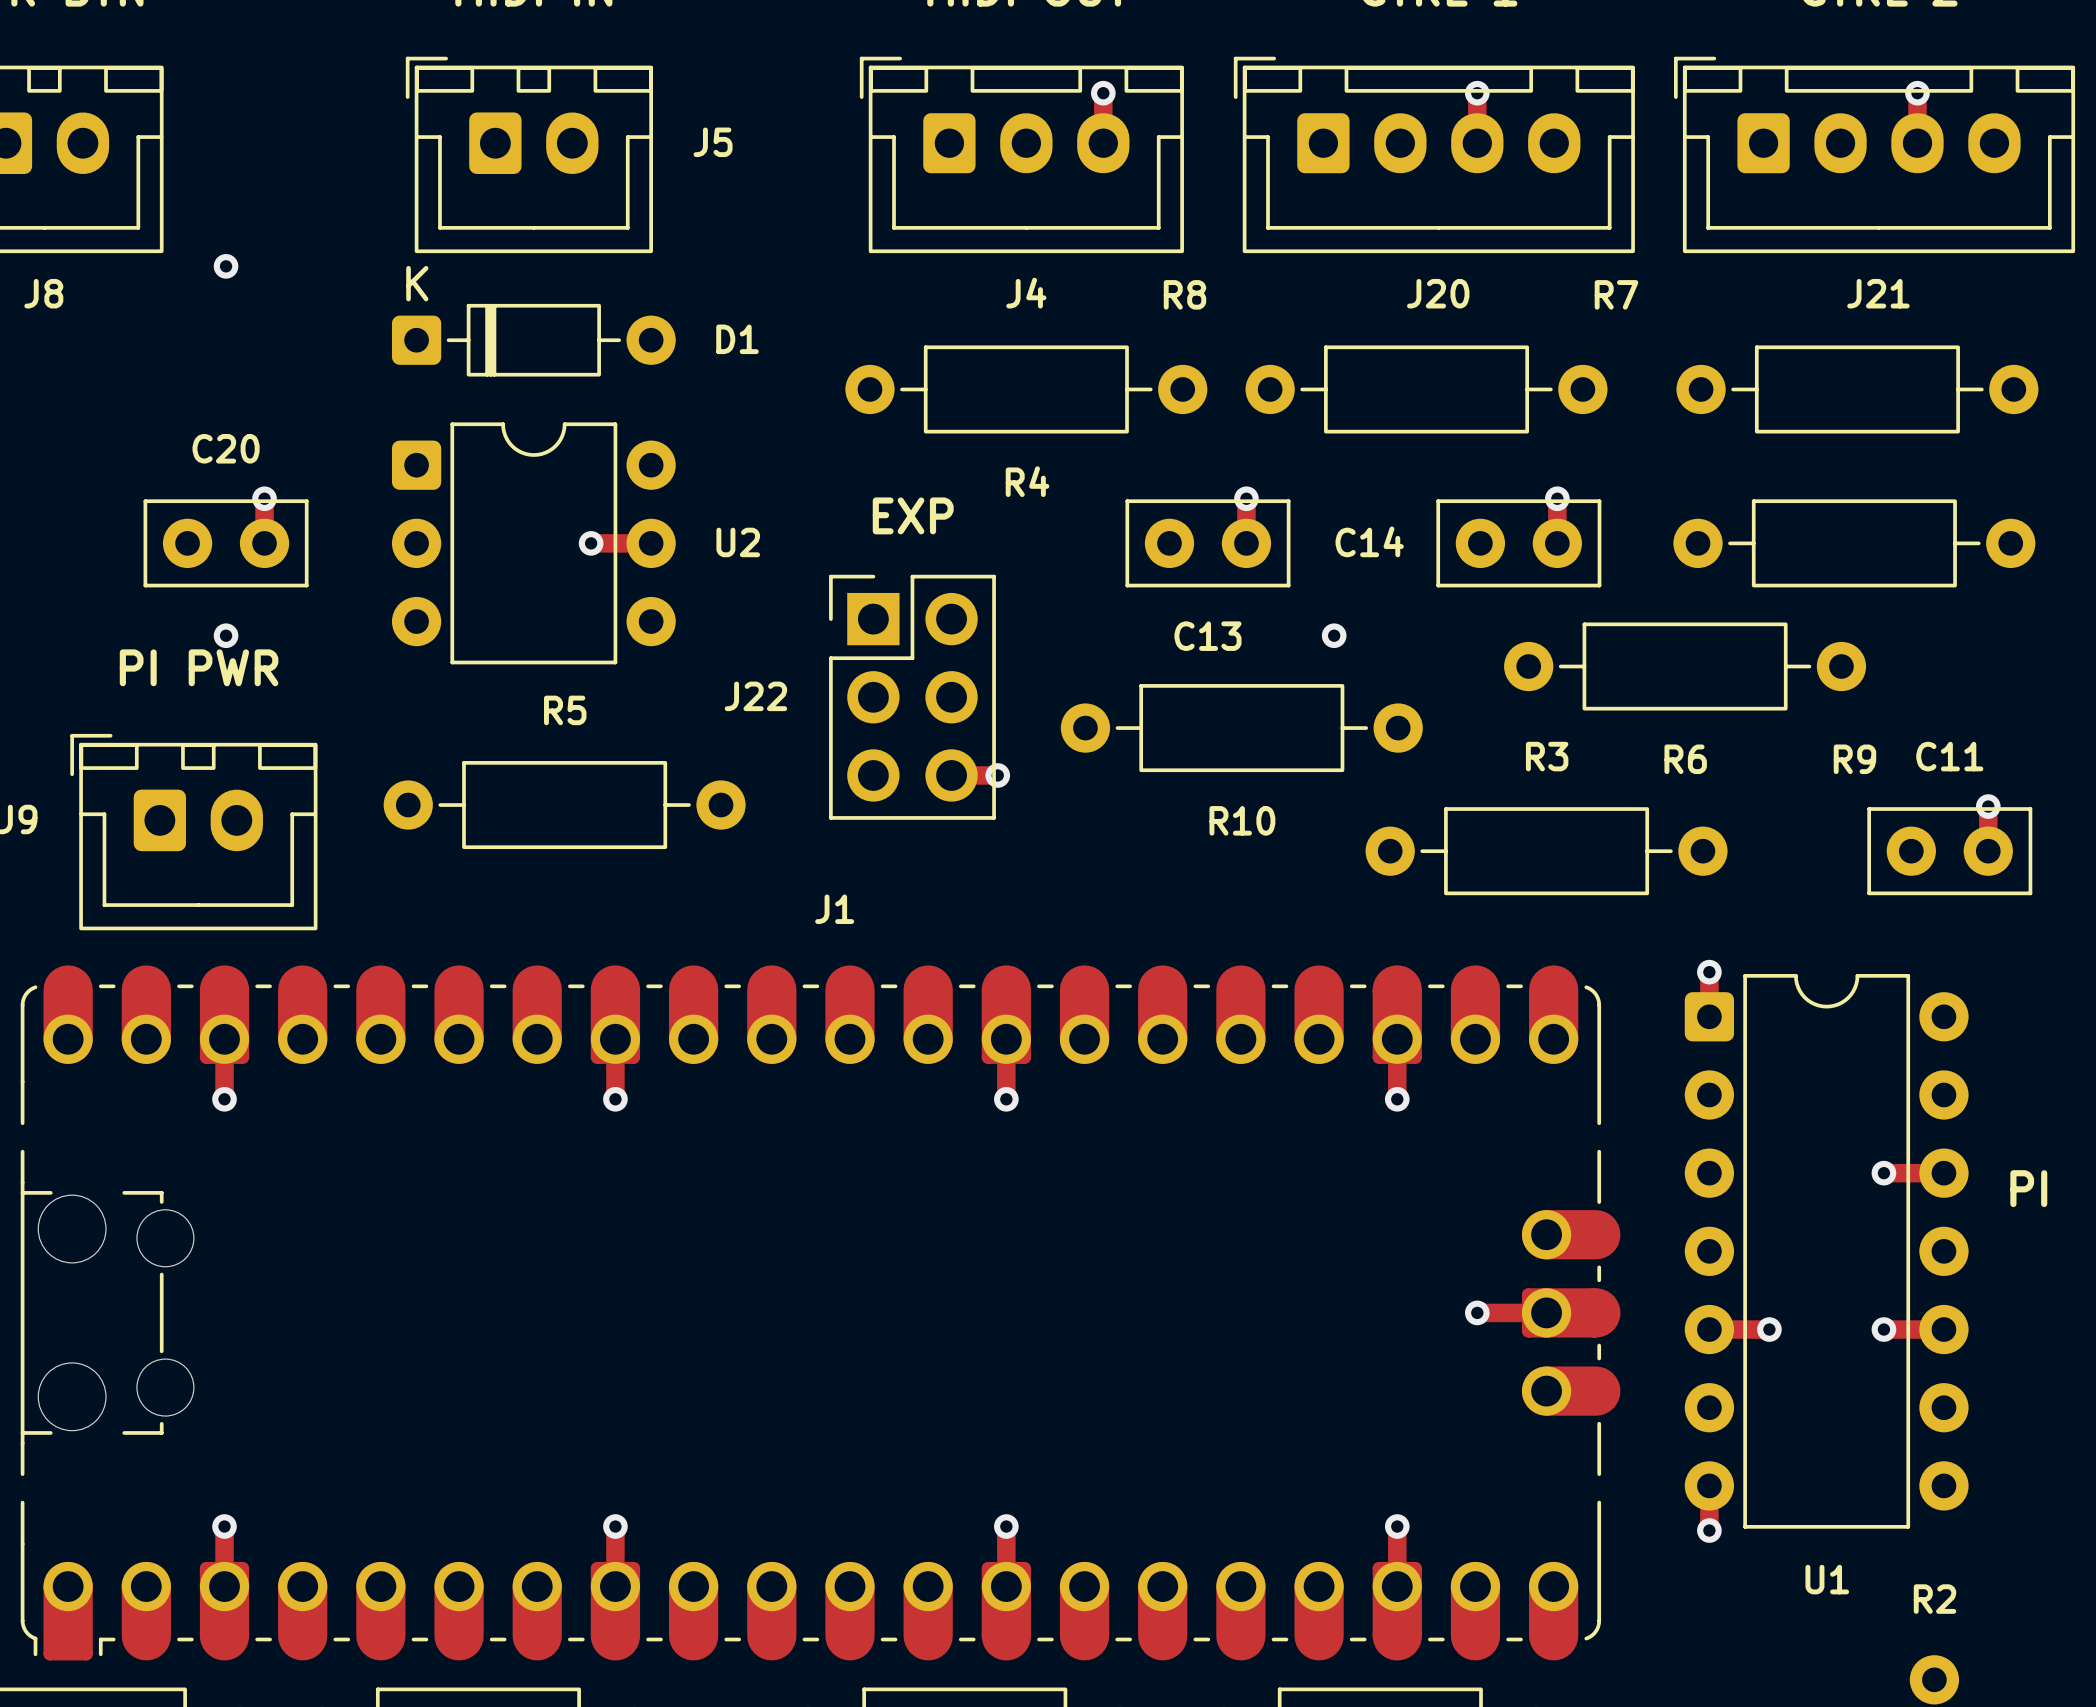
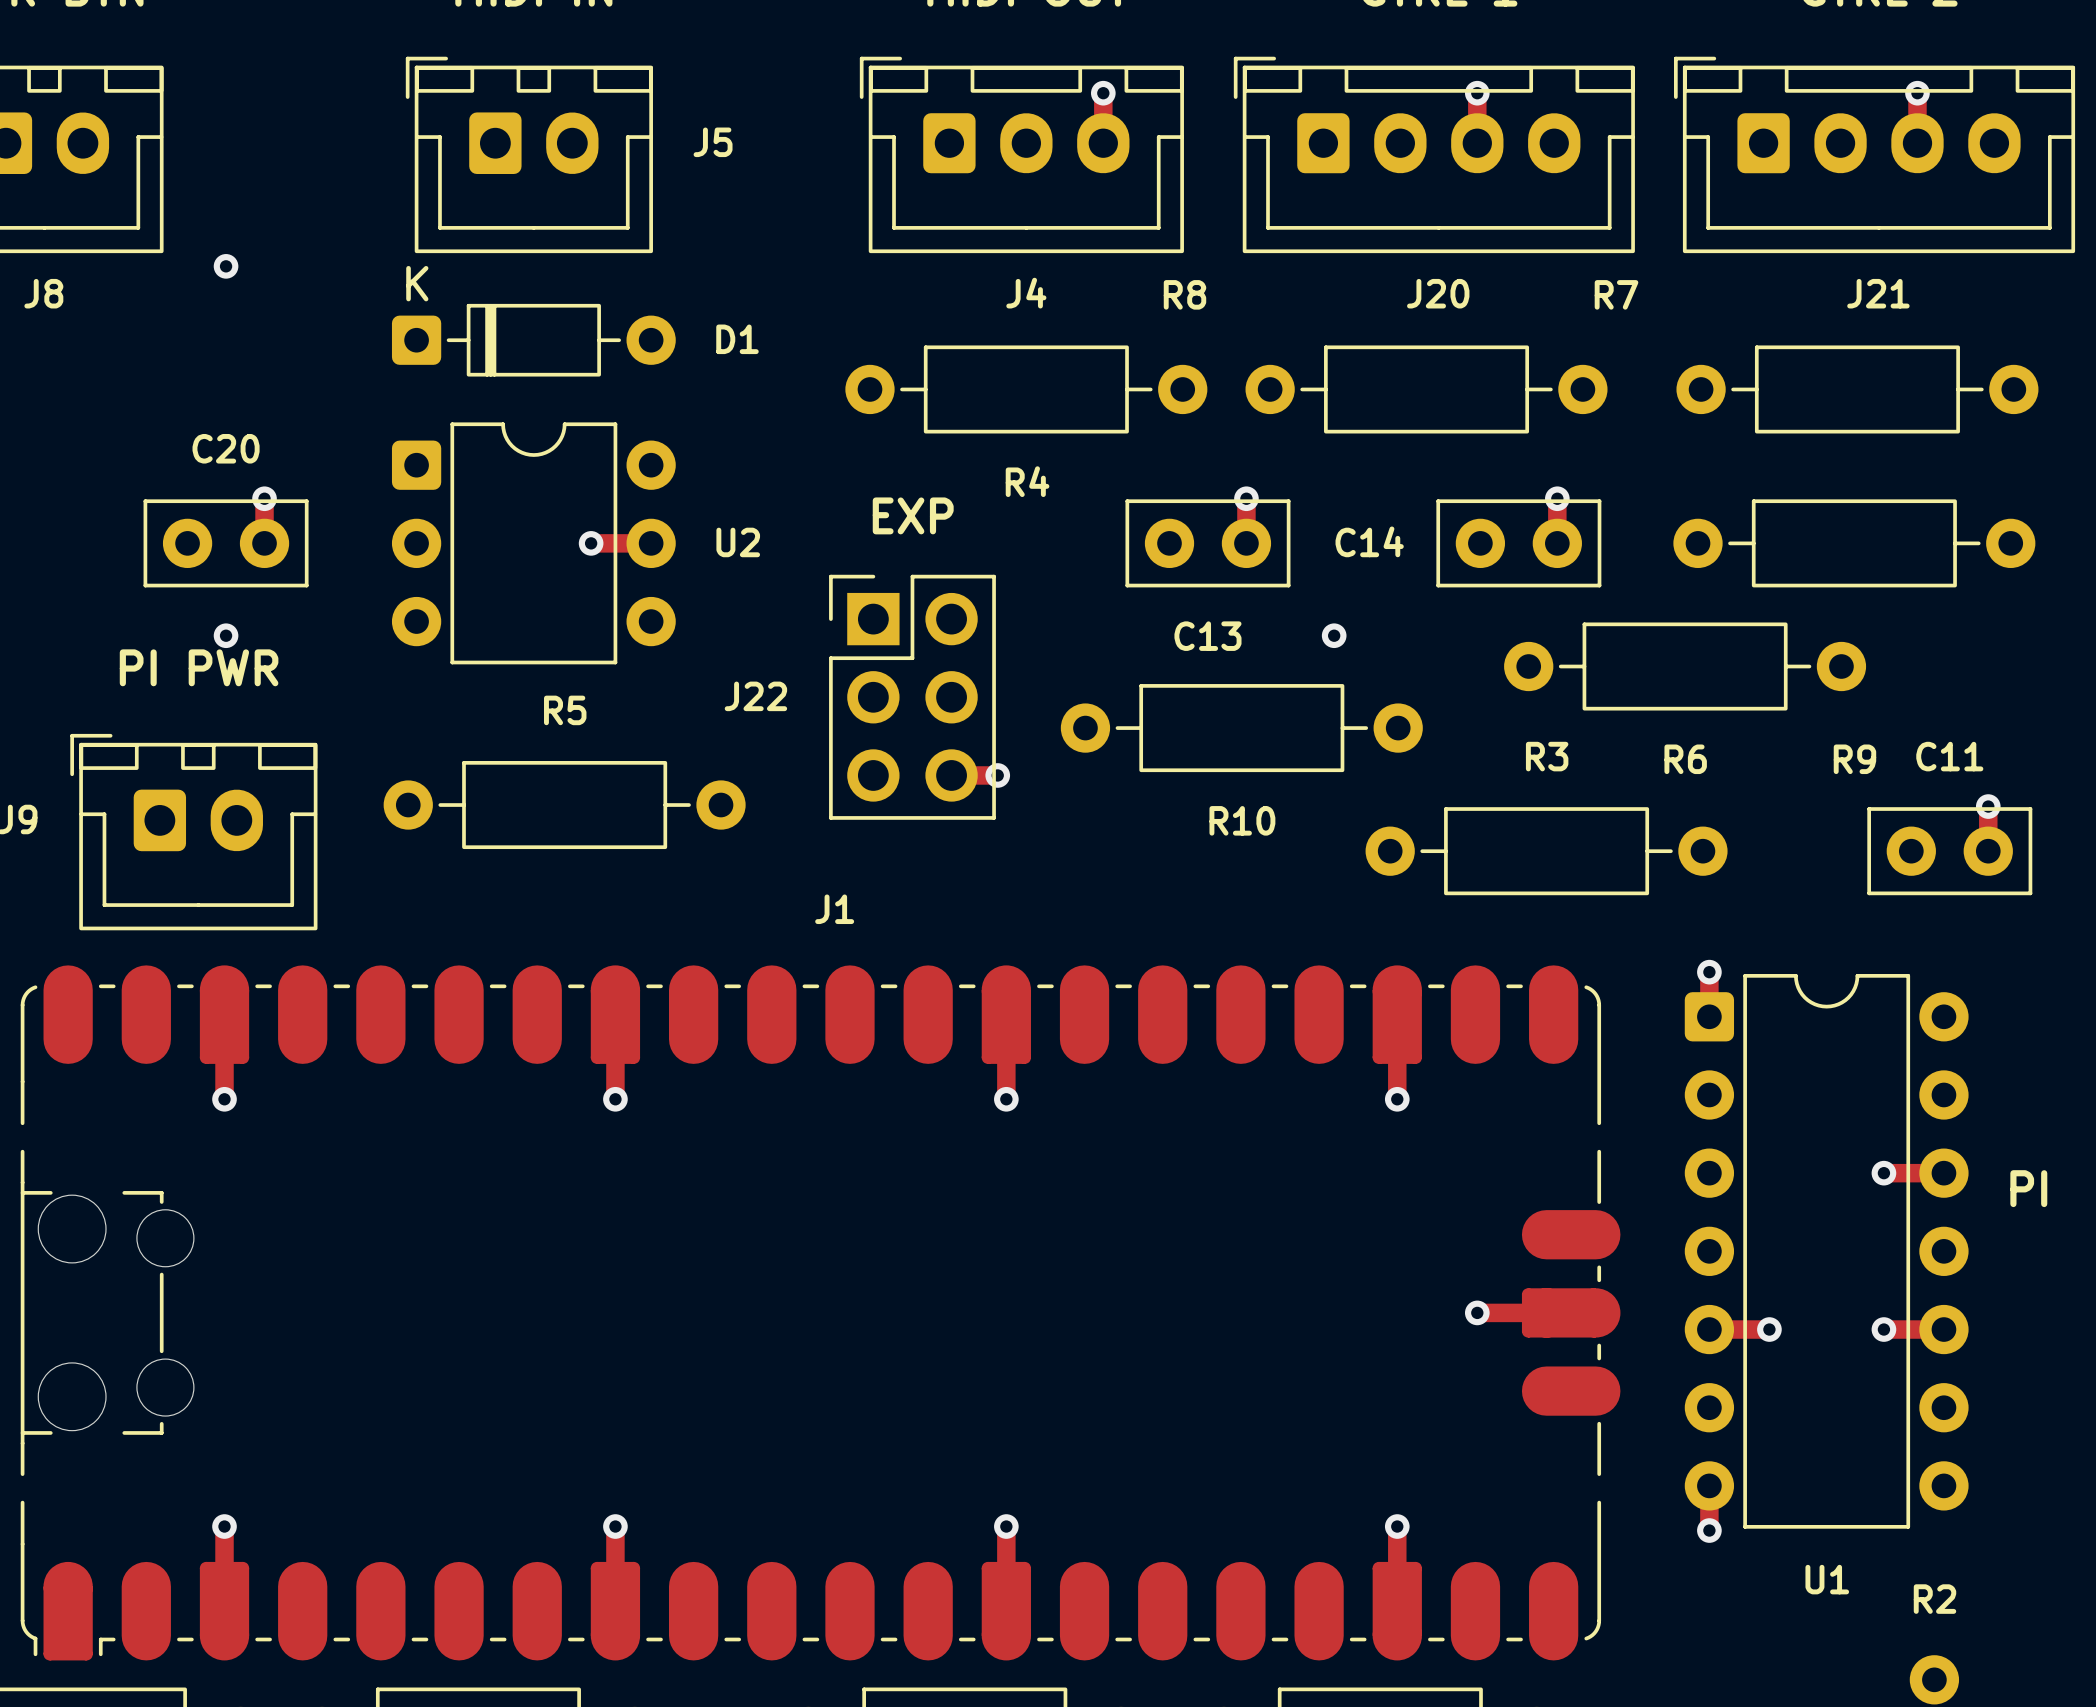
J1 footprint: [20, 965, 1621, 1661] -> [20, 965, 1621, 1661]

